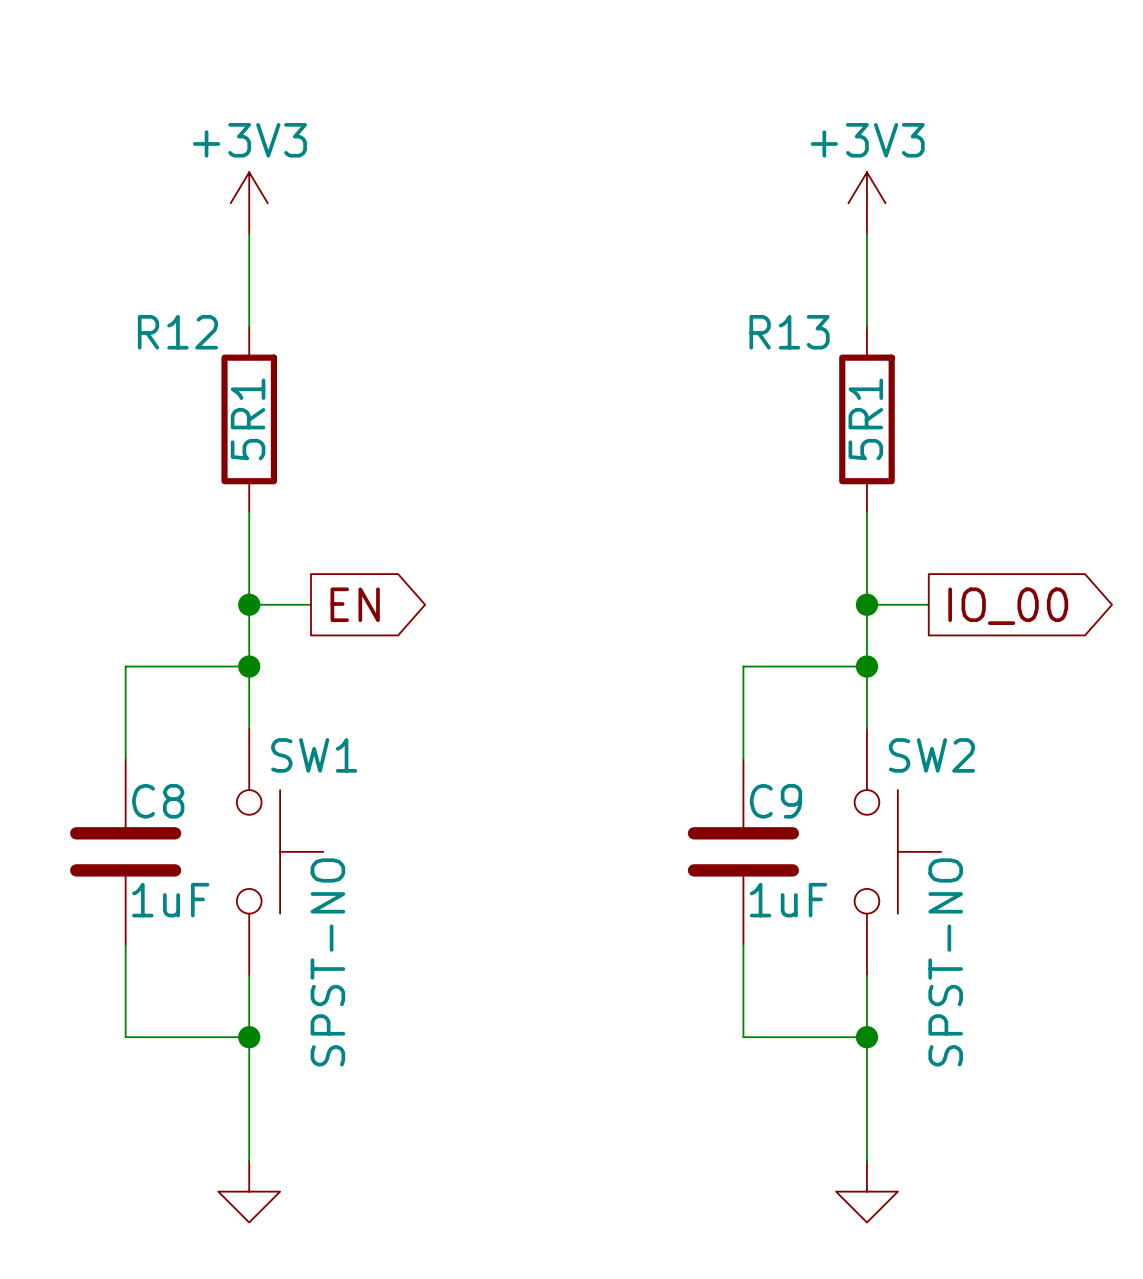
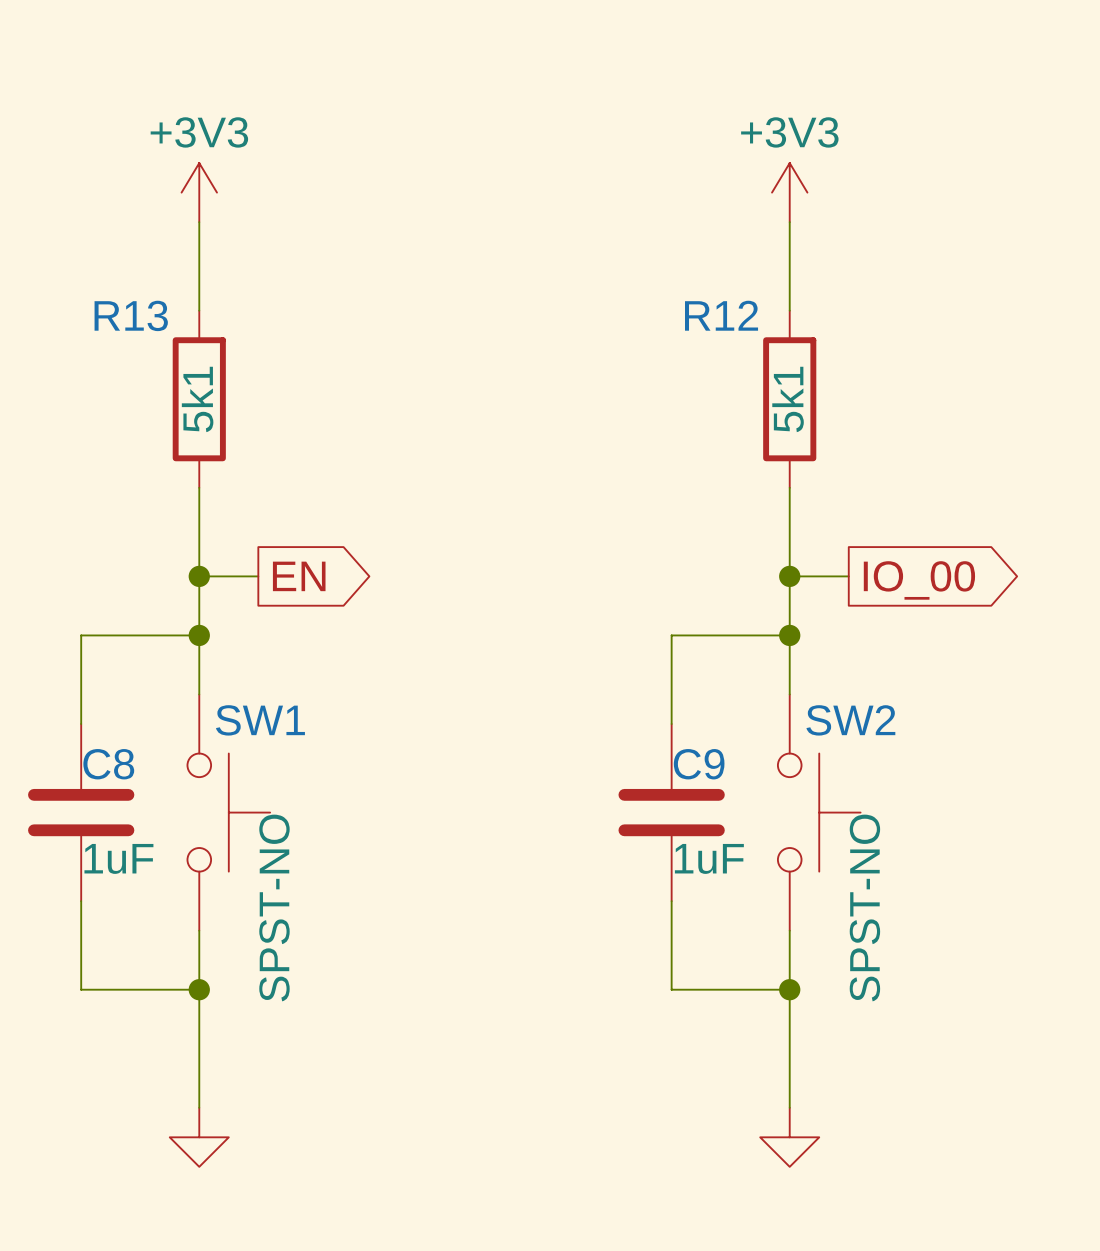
R12 name: R12 (177, 332) -> R13 (131, 315)
R13 name: R13 (789, 332) -> R12 (721, 315)
R12 value: 5R1 (248, 419) -> 5k1 (197, 399)
R13 value: 5R1 (865, 419) -> 5k1 (788, 399)

